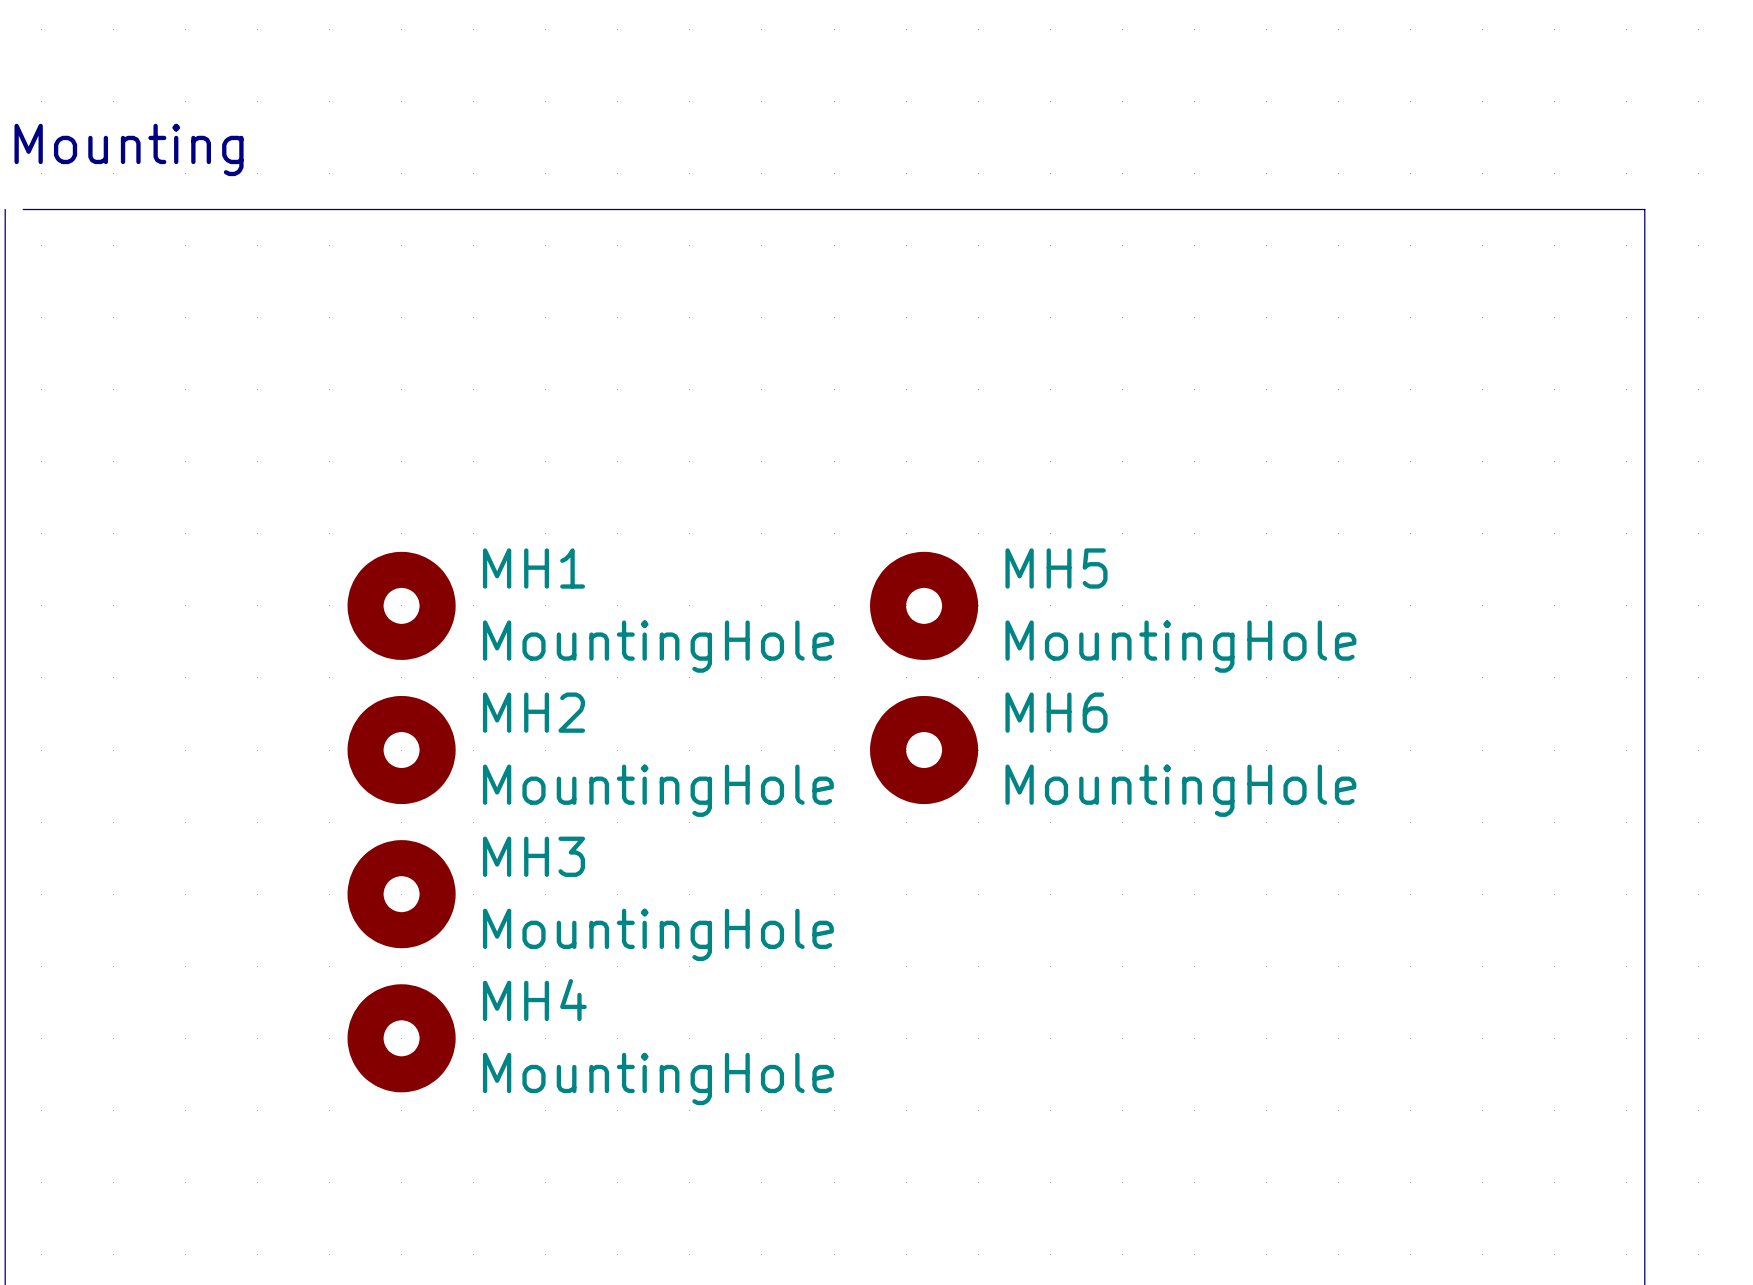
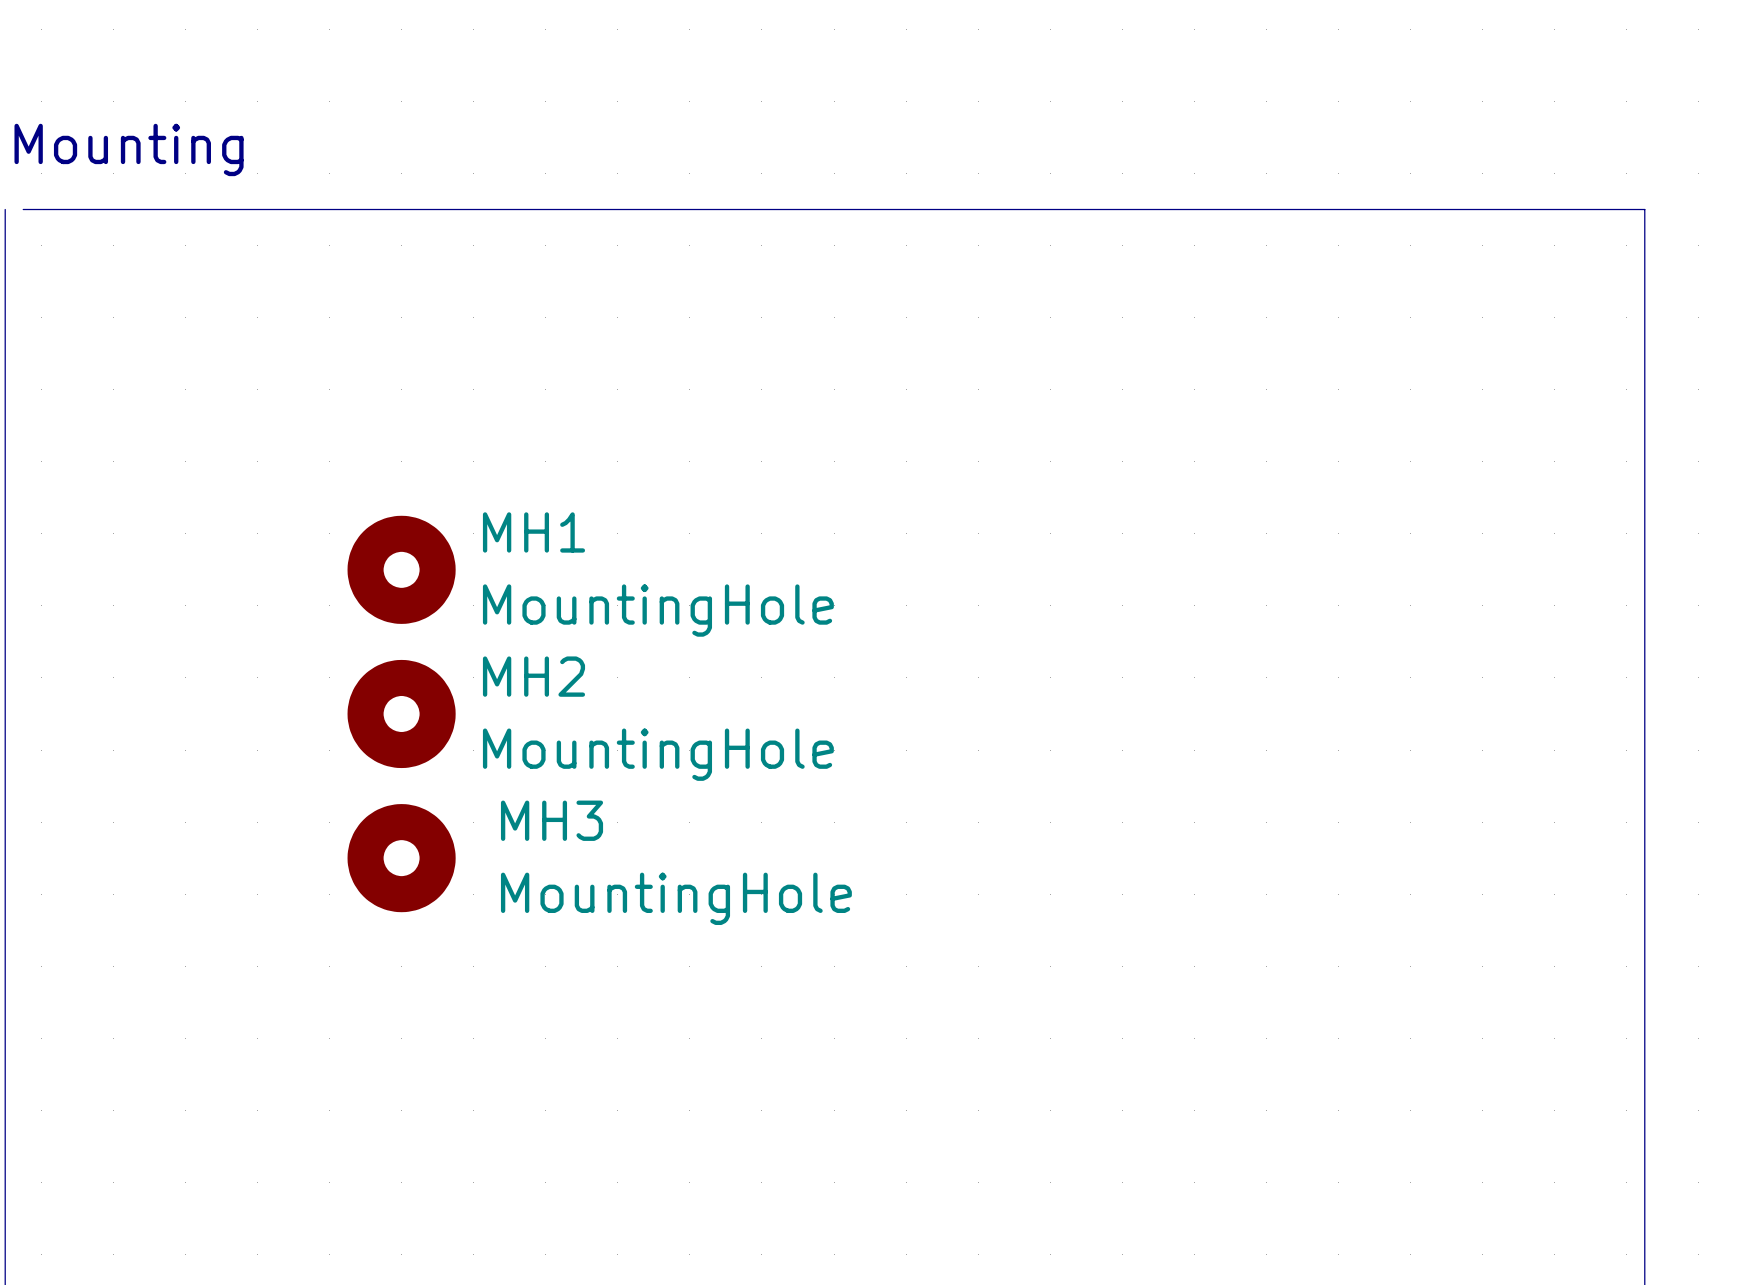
MH1 position: (401, 605) -> (401, 569)
MH5: MountingHole (924, 605) -> none
MH2 position: (401, 750) -> (401, 713)
MH6: MountingHole (924, 750) -> none
MH3 name position: MH3 (533, 856) -> MH3 (552, 820)
MH3 position: (401, 894) -> (401, 858)
MH3 value position: MountingHole (658, 934) -> MountingHole (676, 898)
MH4: MountingHole (401, 1038) -> none

